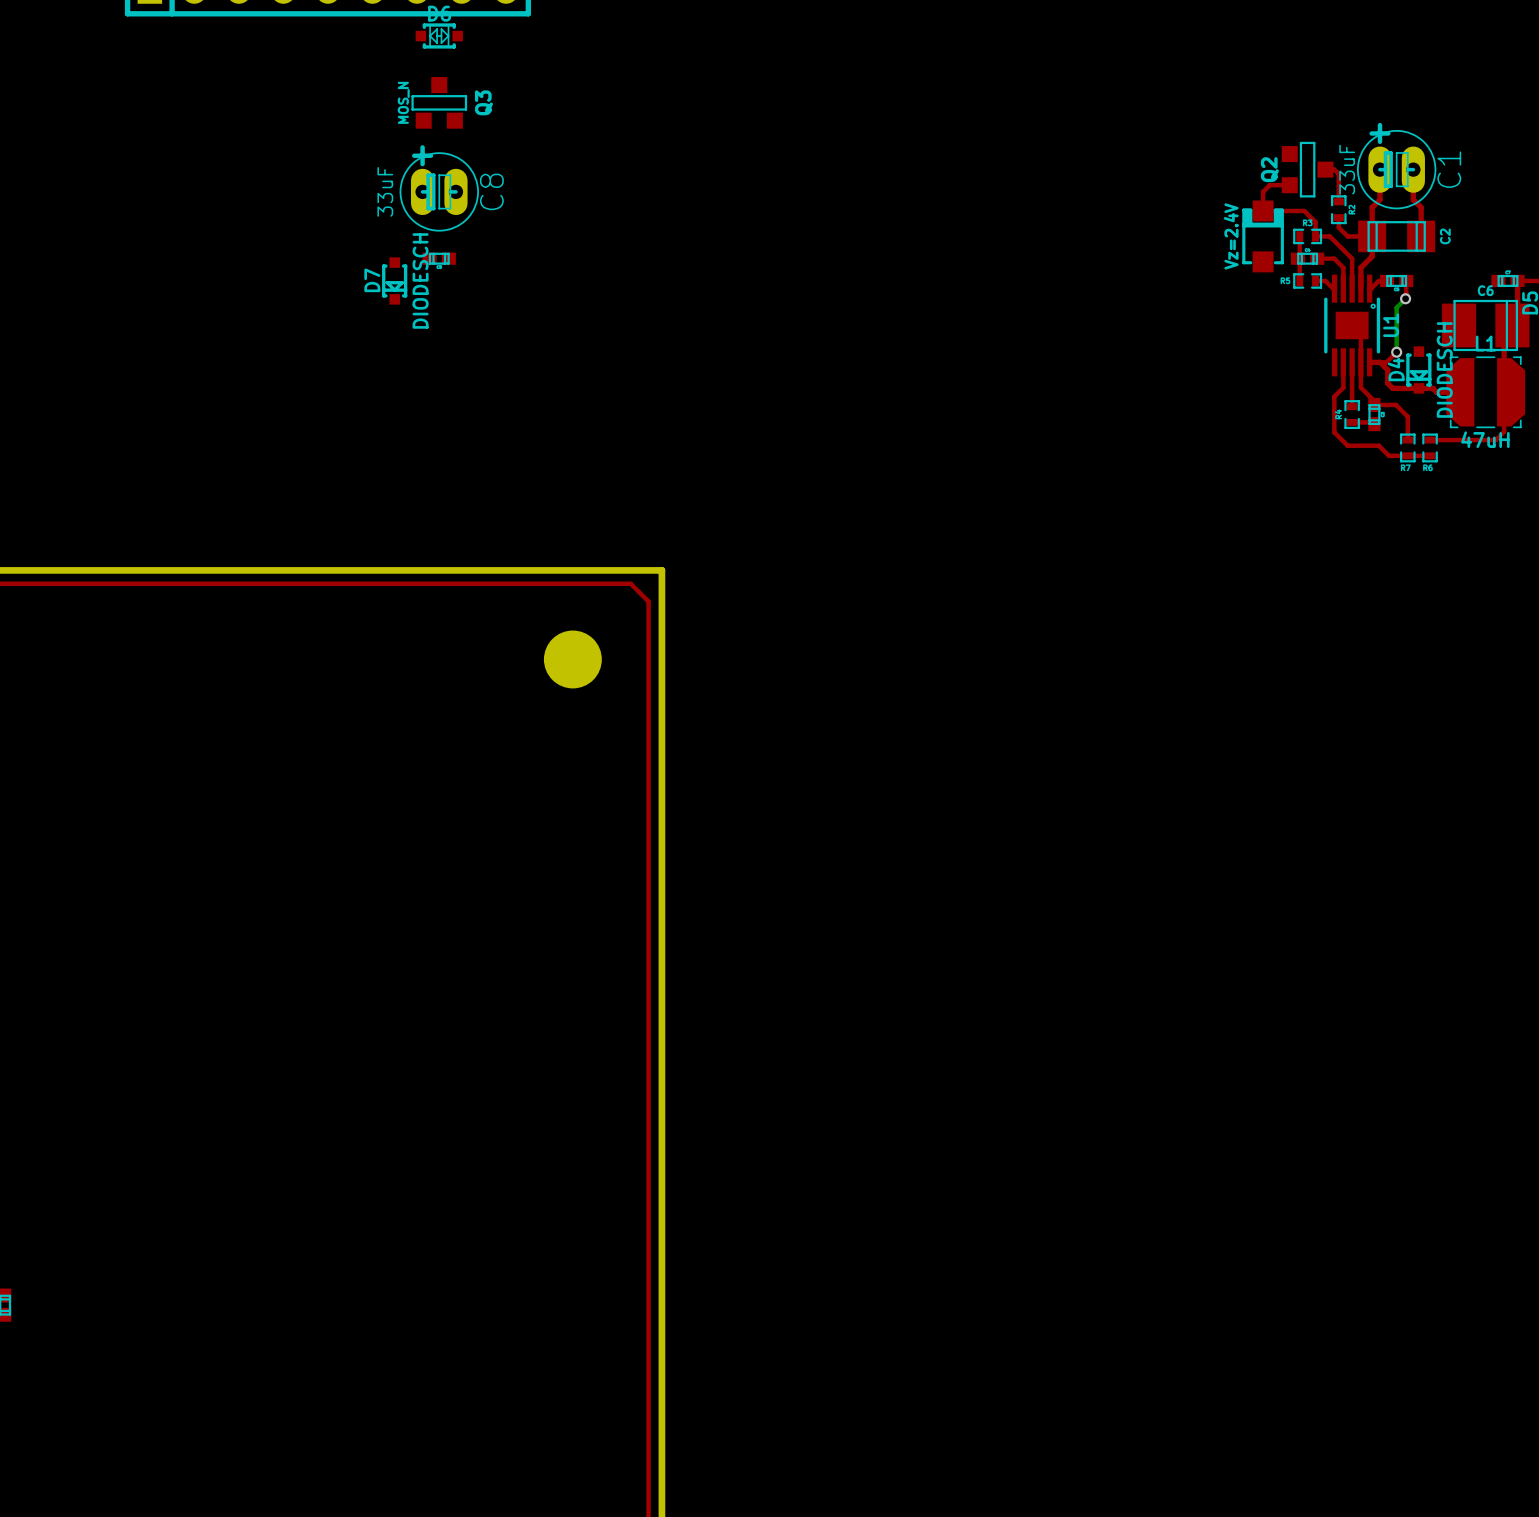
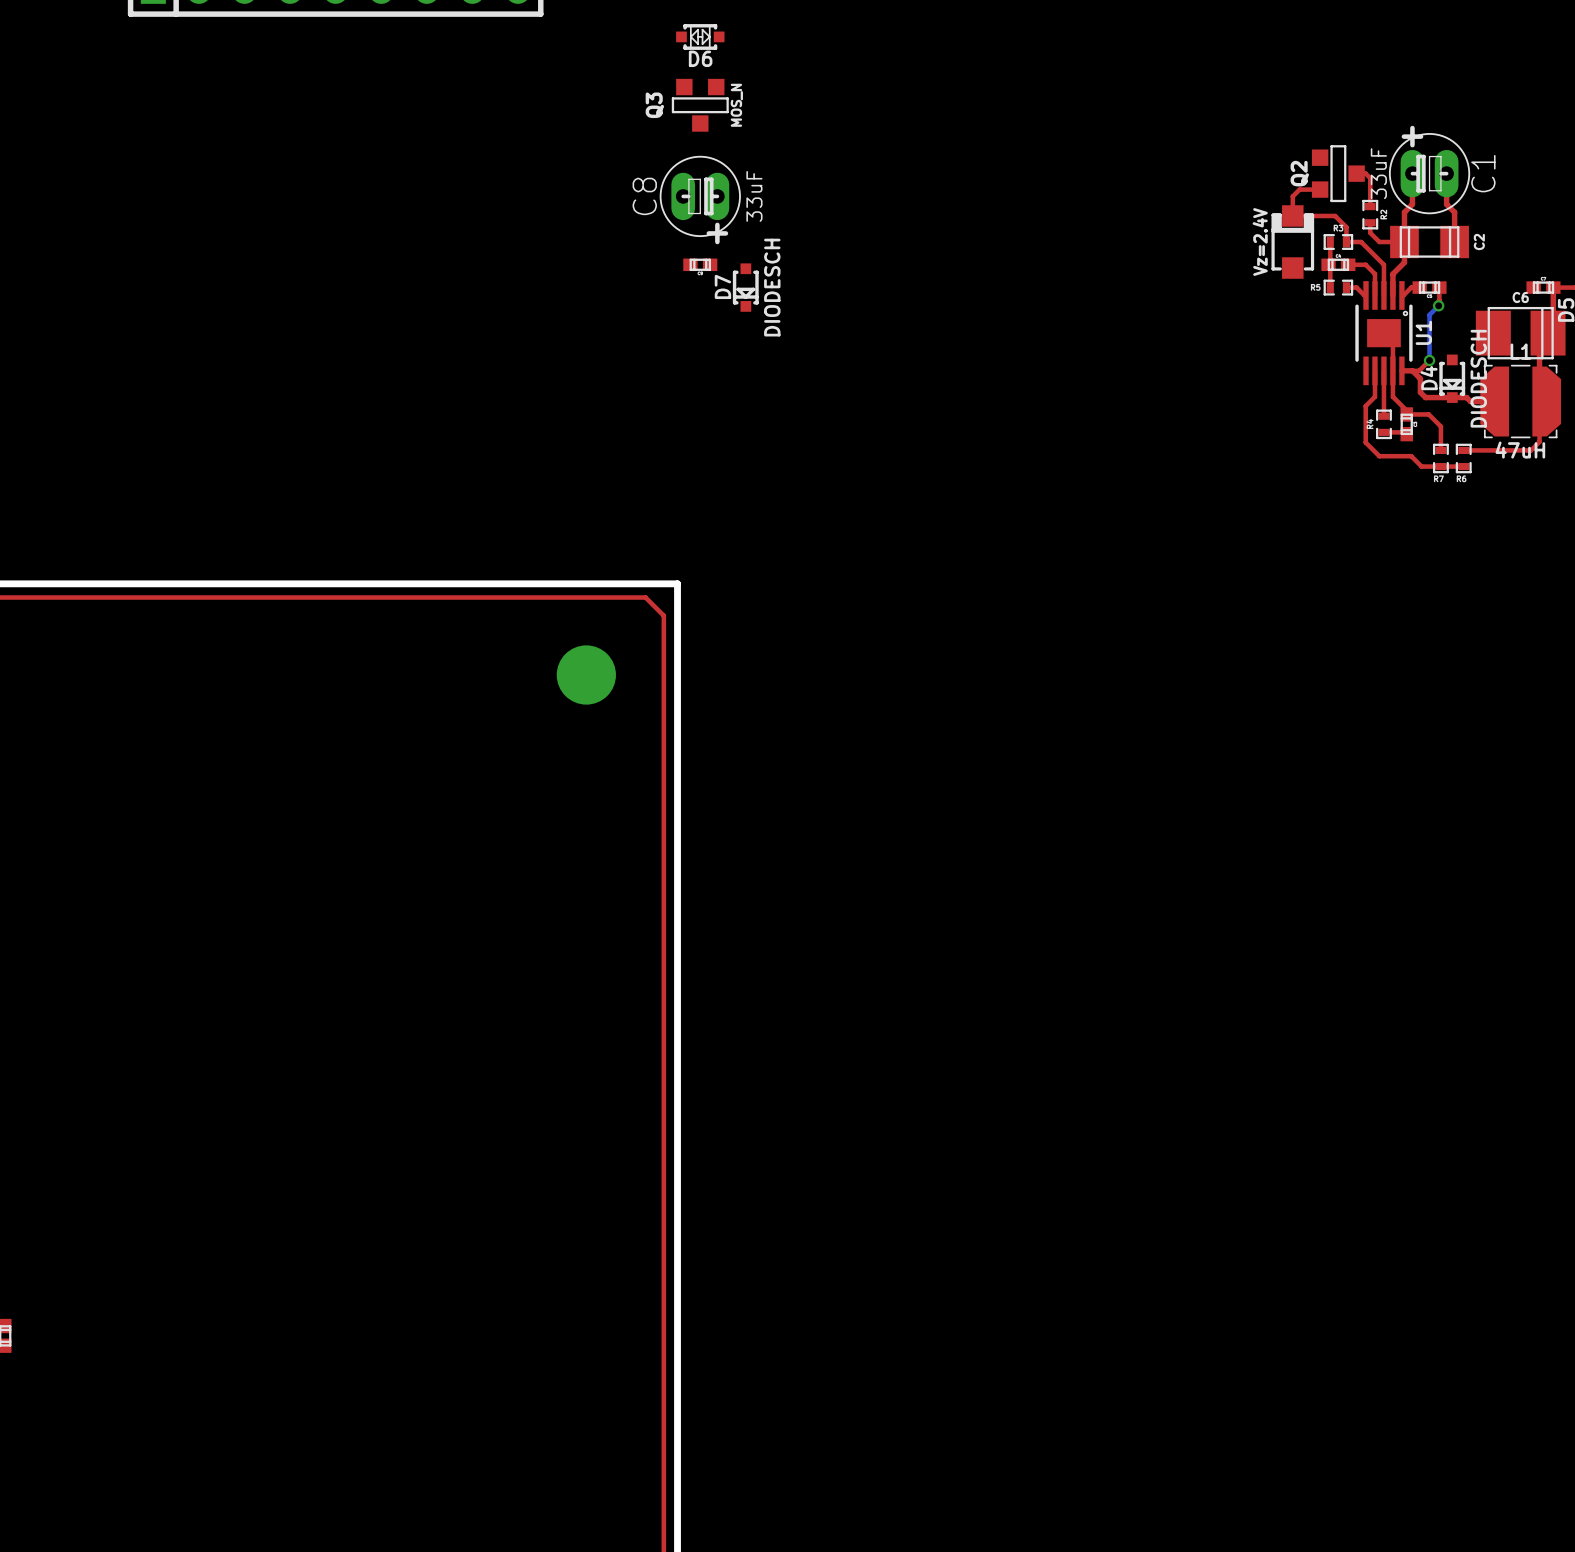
D6 rotation: 0° (439, 36) -> 180° (700, 36)
D6 position: (439, 36) -> (700, 36)
Q3 rotation: 0° (439, 102) -> 180° (700, 105)
Q3 position: (439, 102) -> (700, 105)
C8 rotation: 0° (439, 188) -> 180° (700, 200)
C8 position: (439, 188) -> (700, 200)
part position: (439, 258) -> (700, 264)
D7 position: (394, 280) -> (745, 287)

